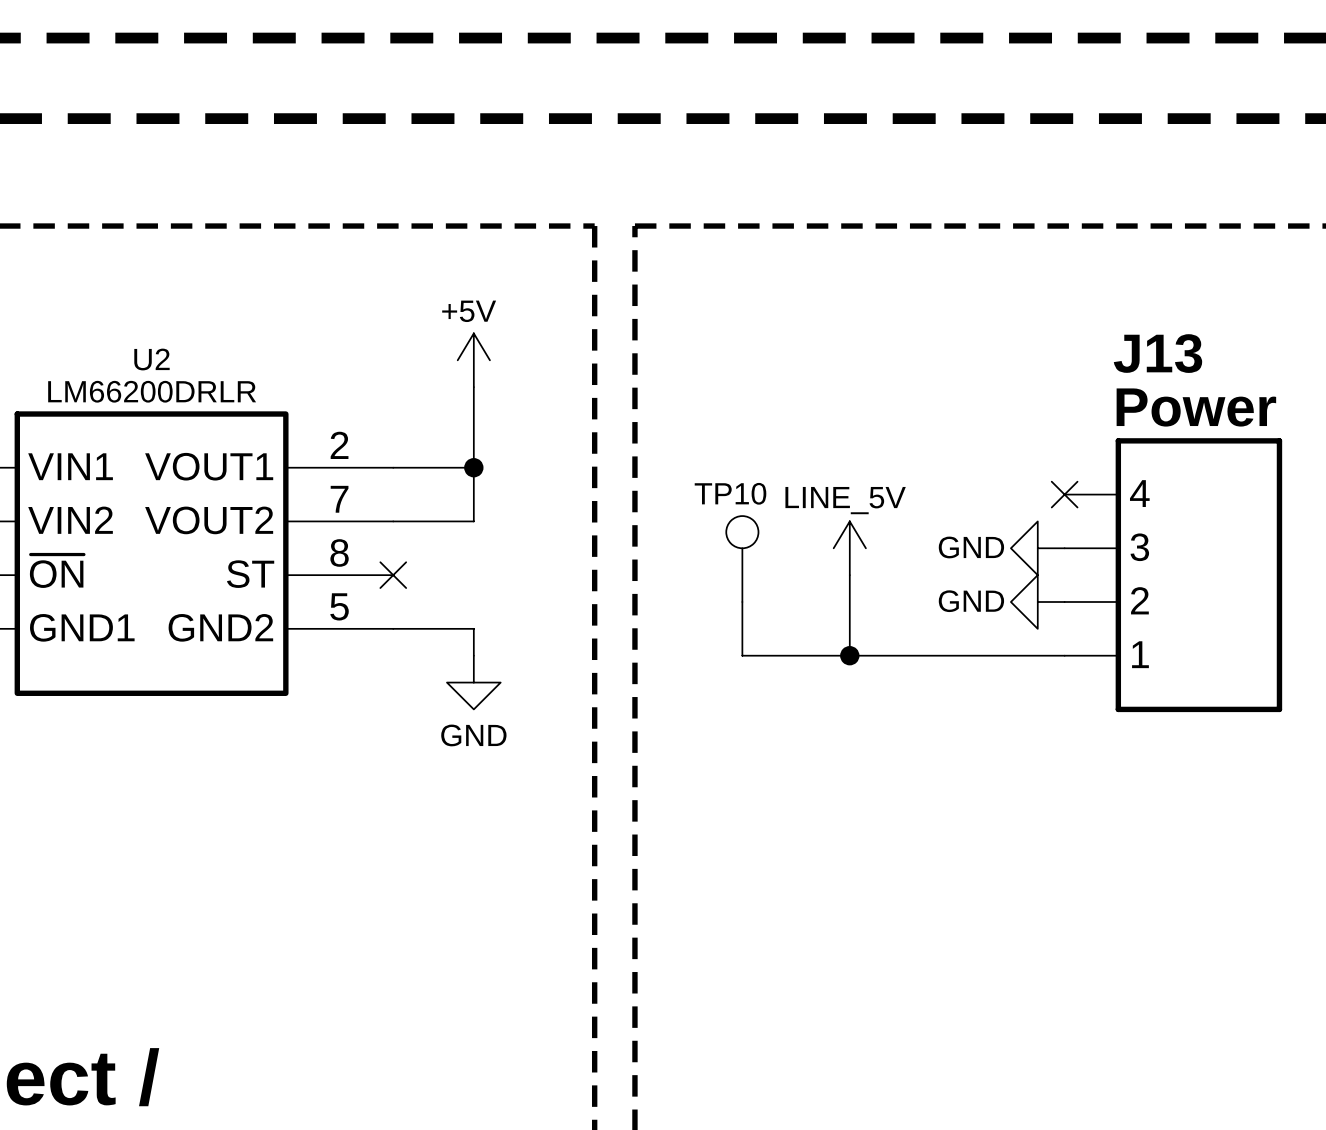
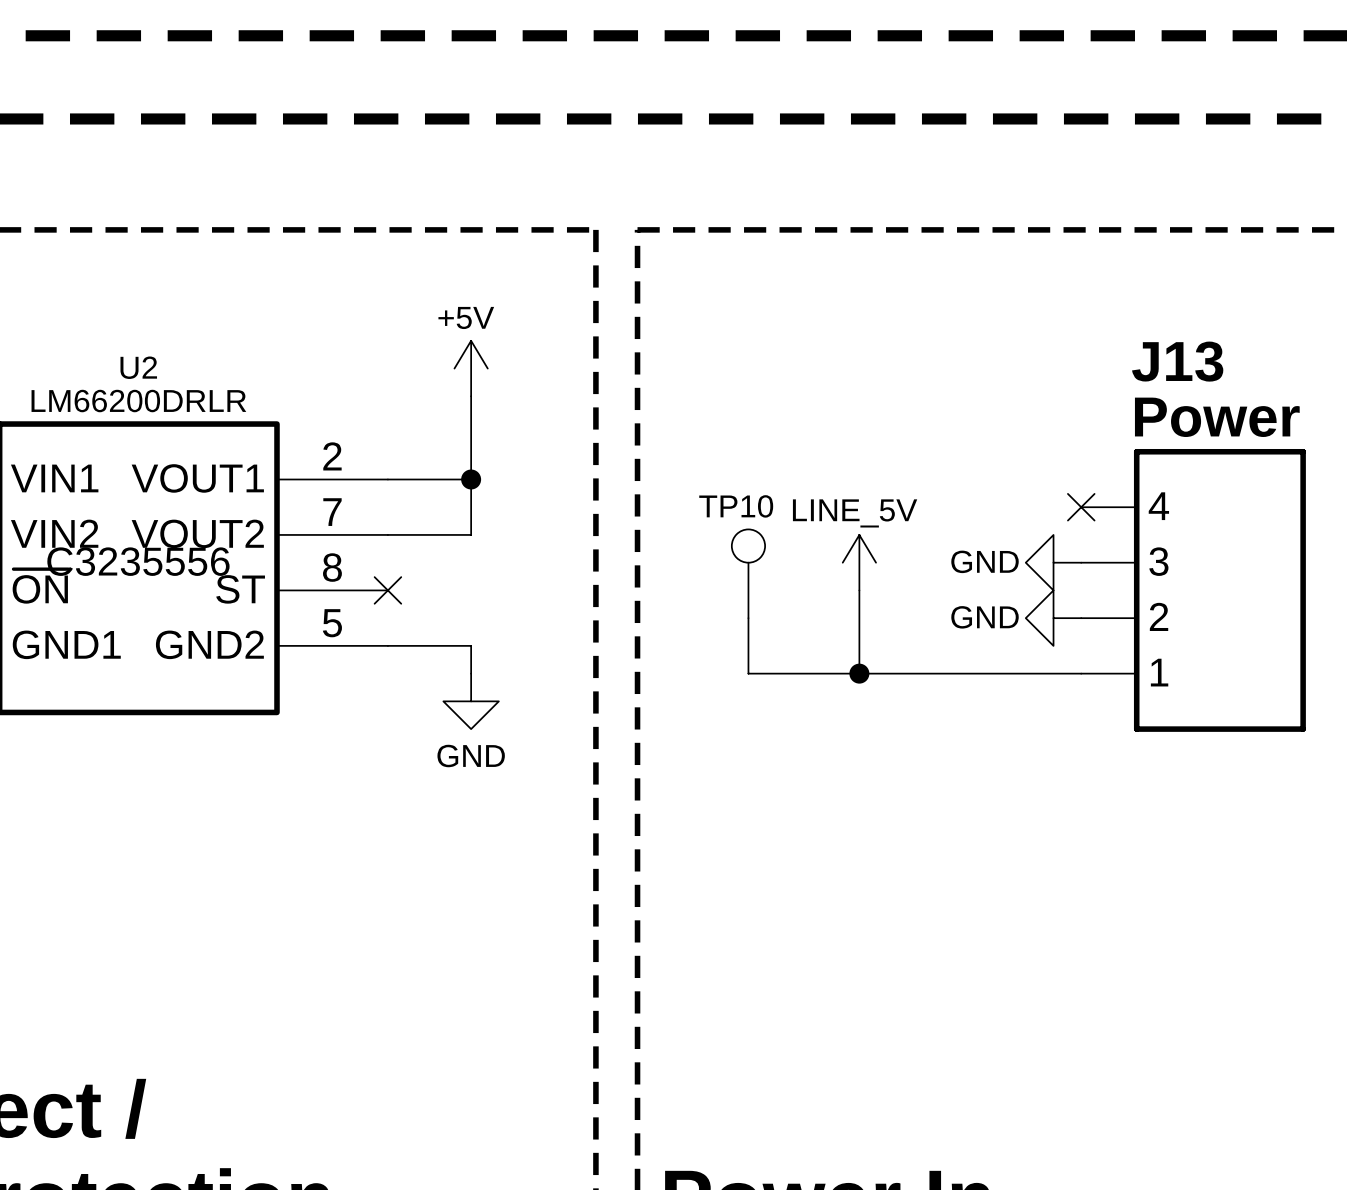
U2 text: none -> C3235556 (138, 561)

